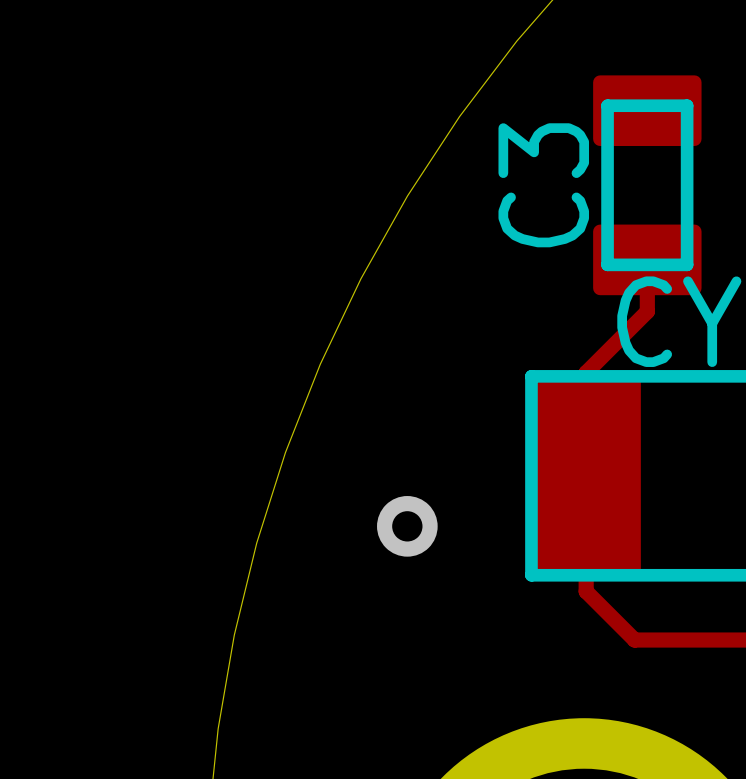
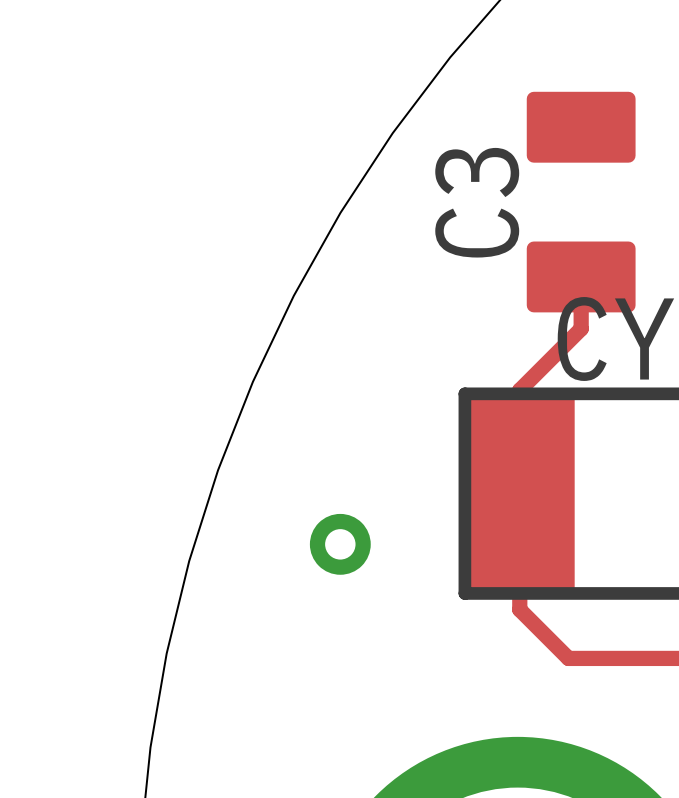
C3 footprint: [593, 75, 702, 296] -> [526, 91, 636, 313]

